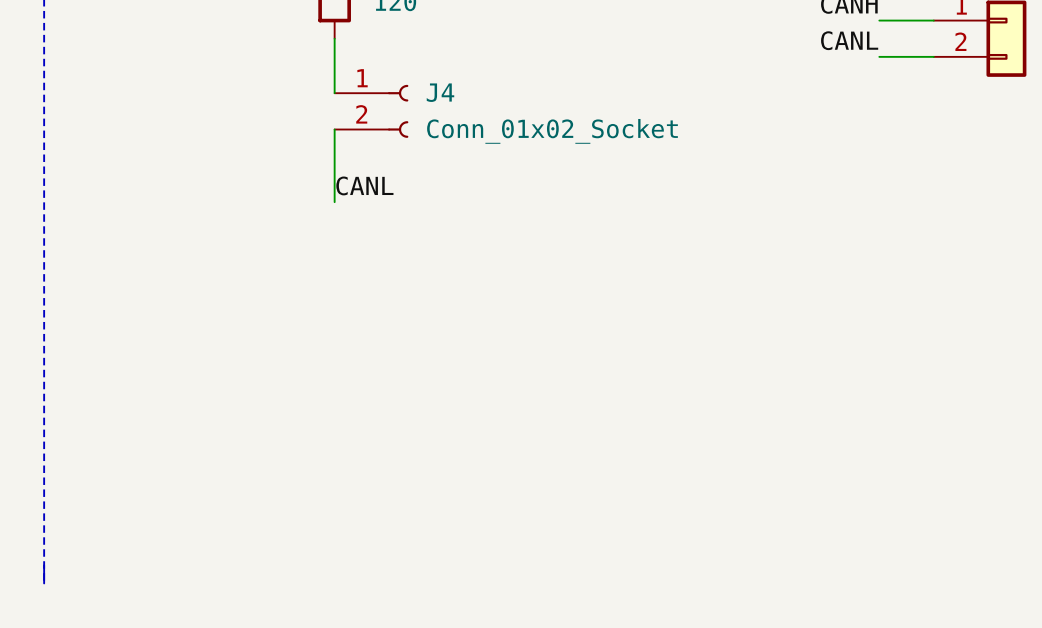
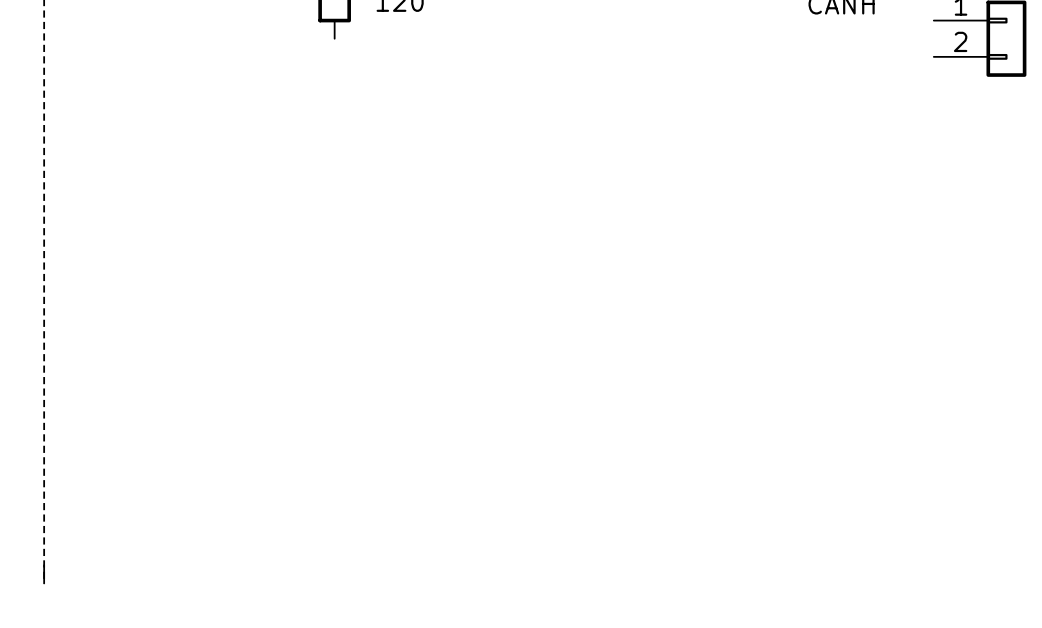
wire: (879, 20) (933, 20) -> none
wire: (334, 38) (334, 93) -> none
label: CANL (849, 40) -> none
wire: (879, 56) (933, 56) -> none
J4: Conn_01x02_Socket (371, 111) -> none
wire: (334, 129) (334, 202) -> none
label: CANL (364, 185) -> none

